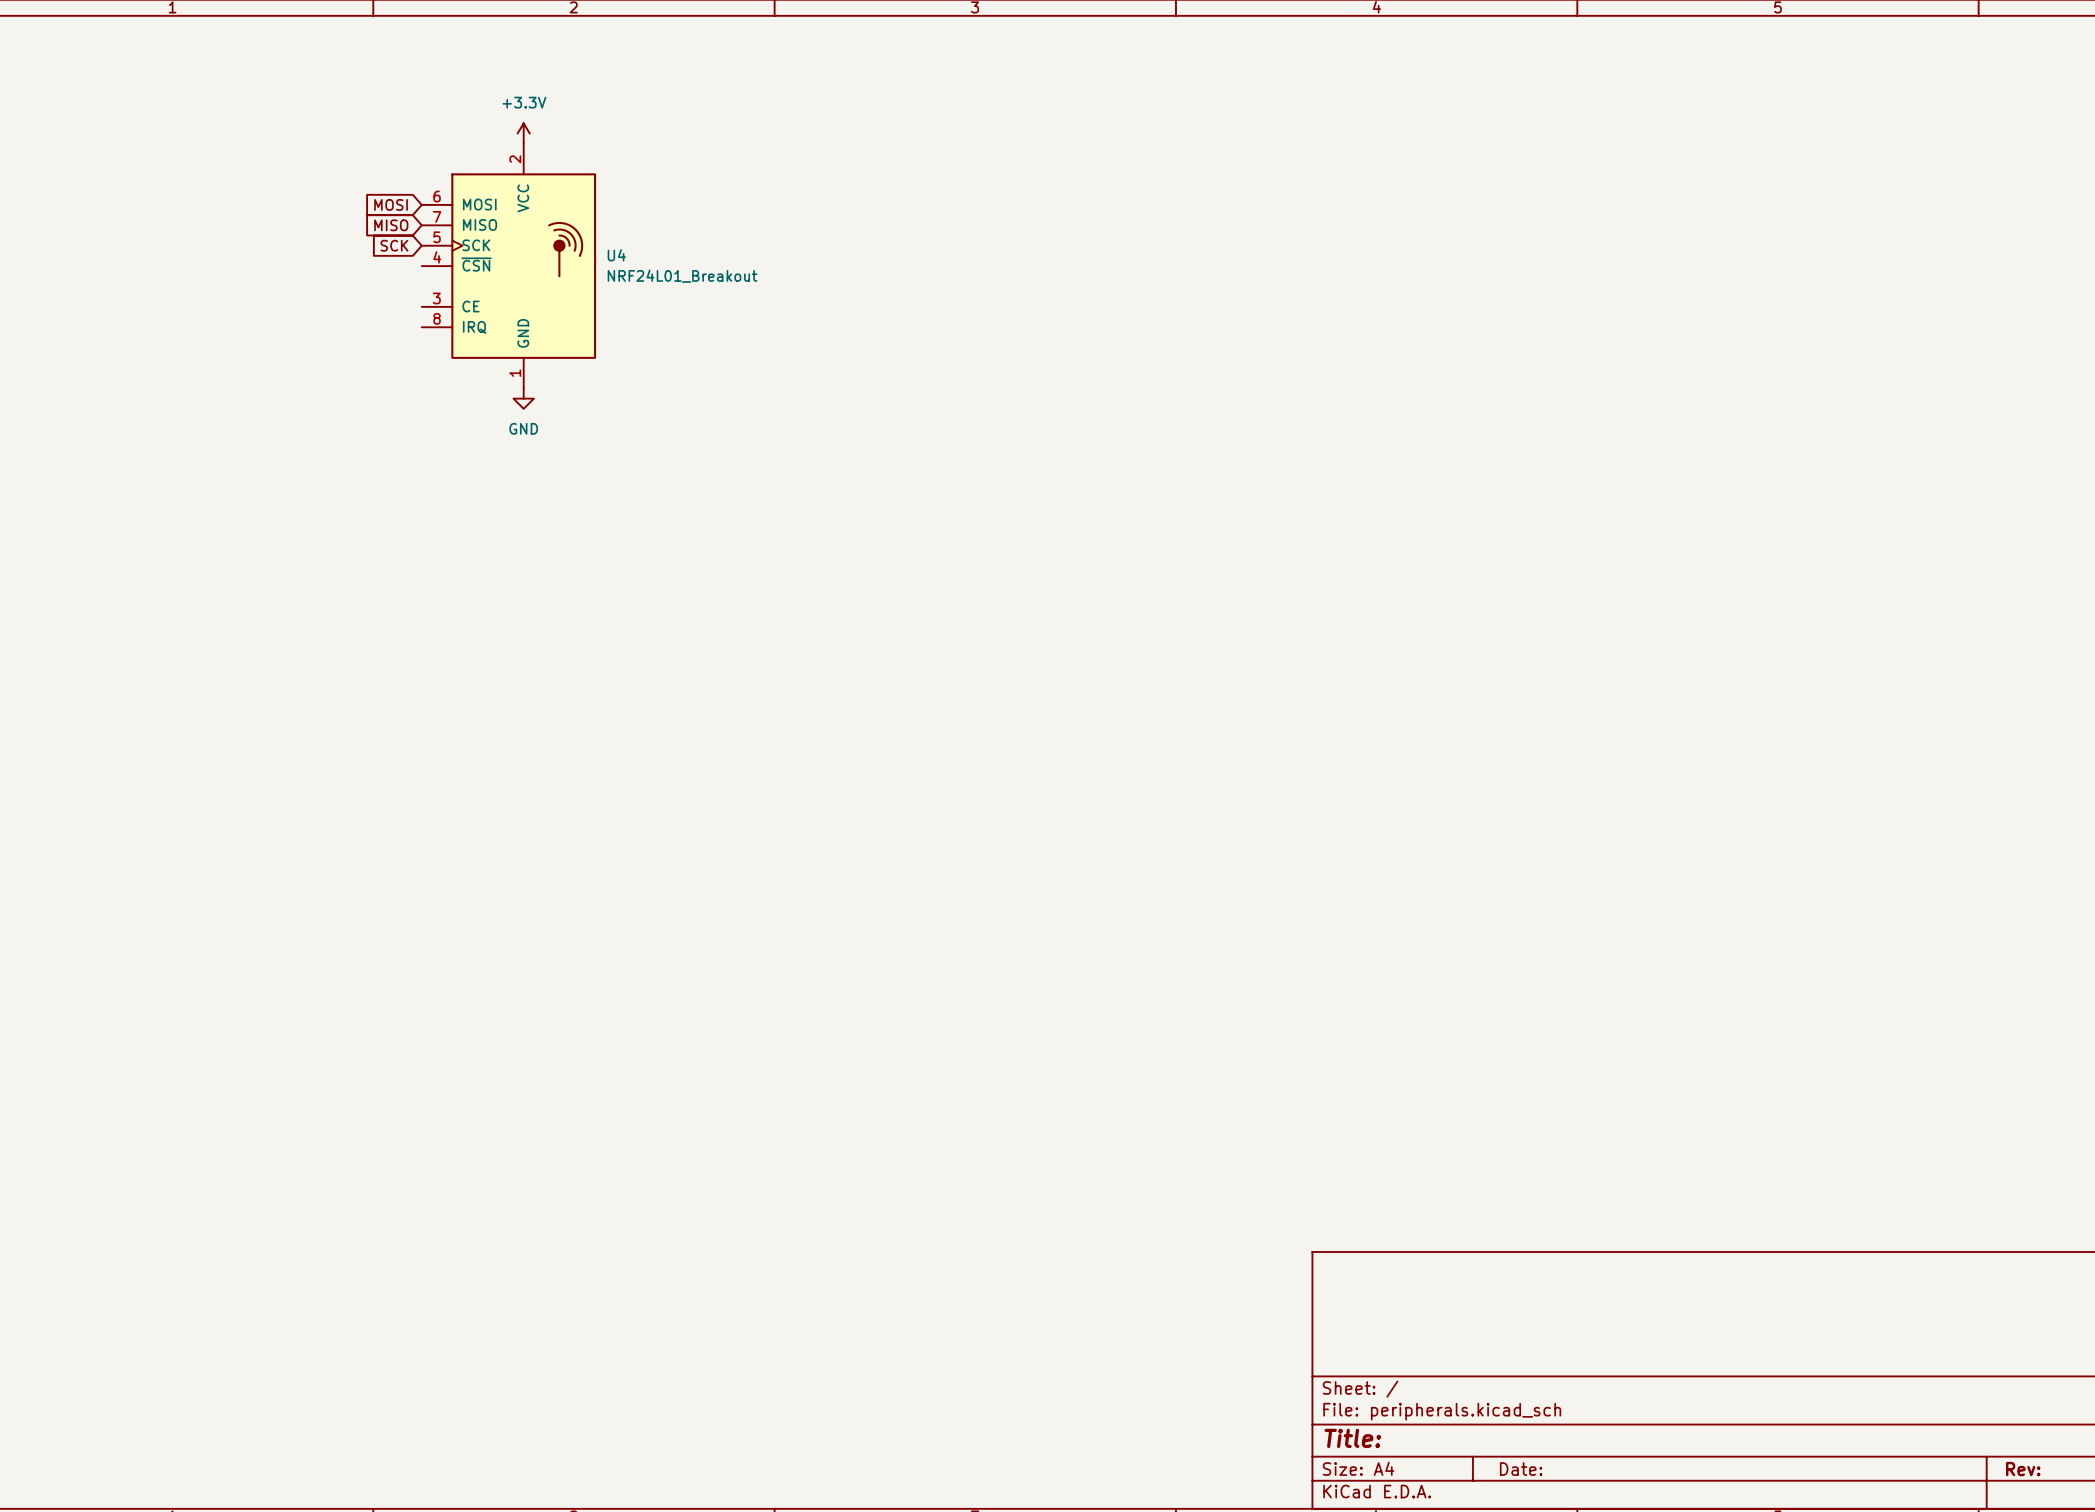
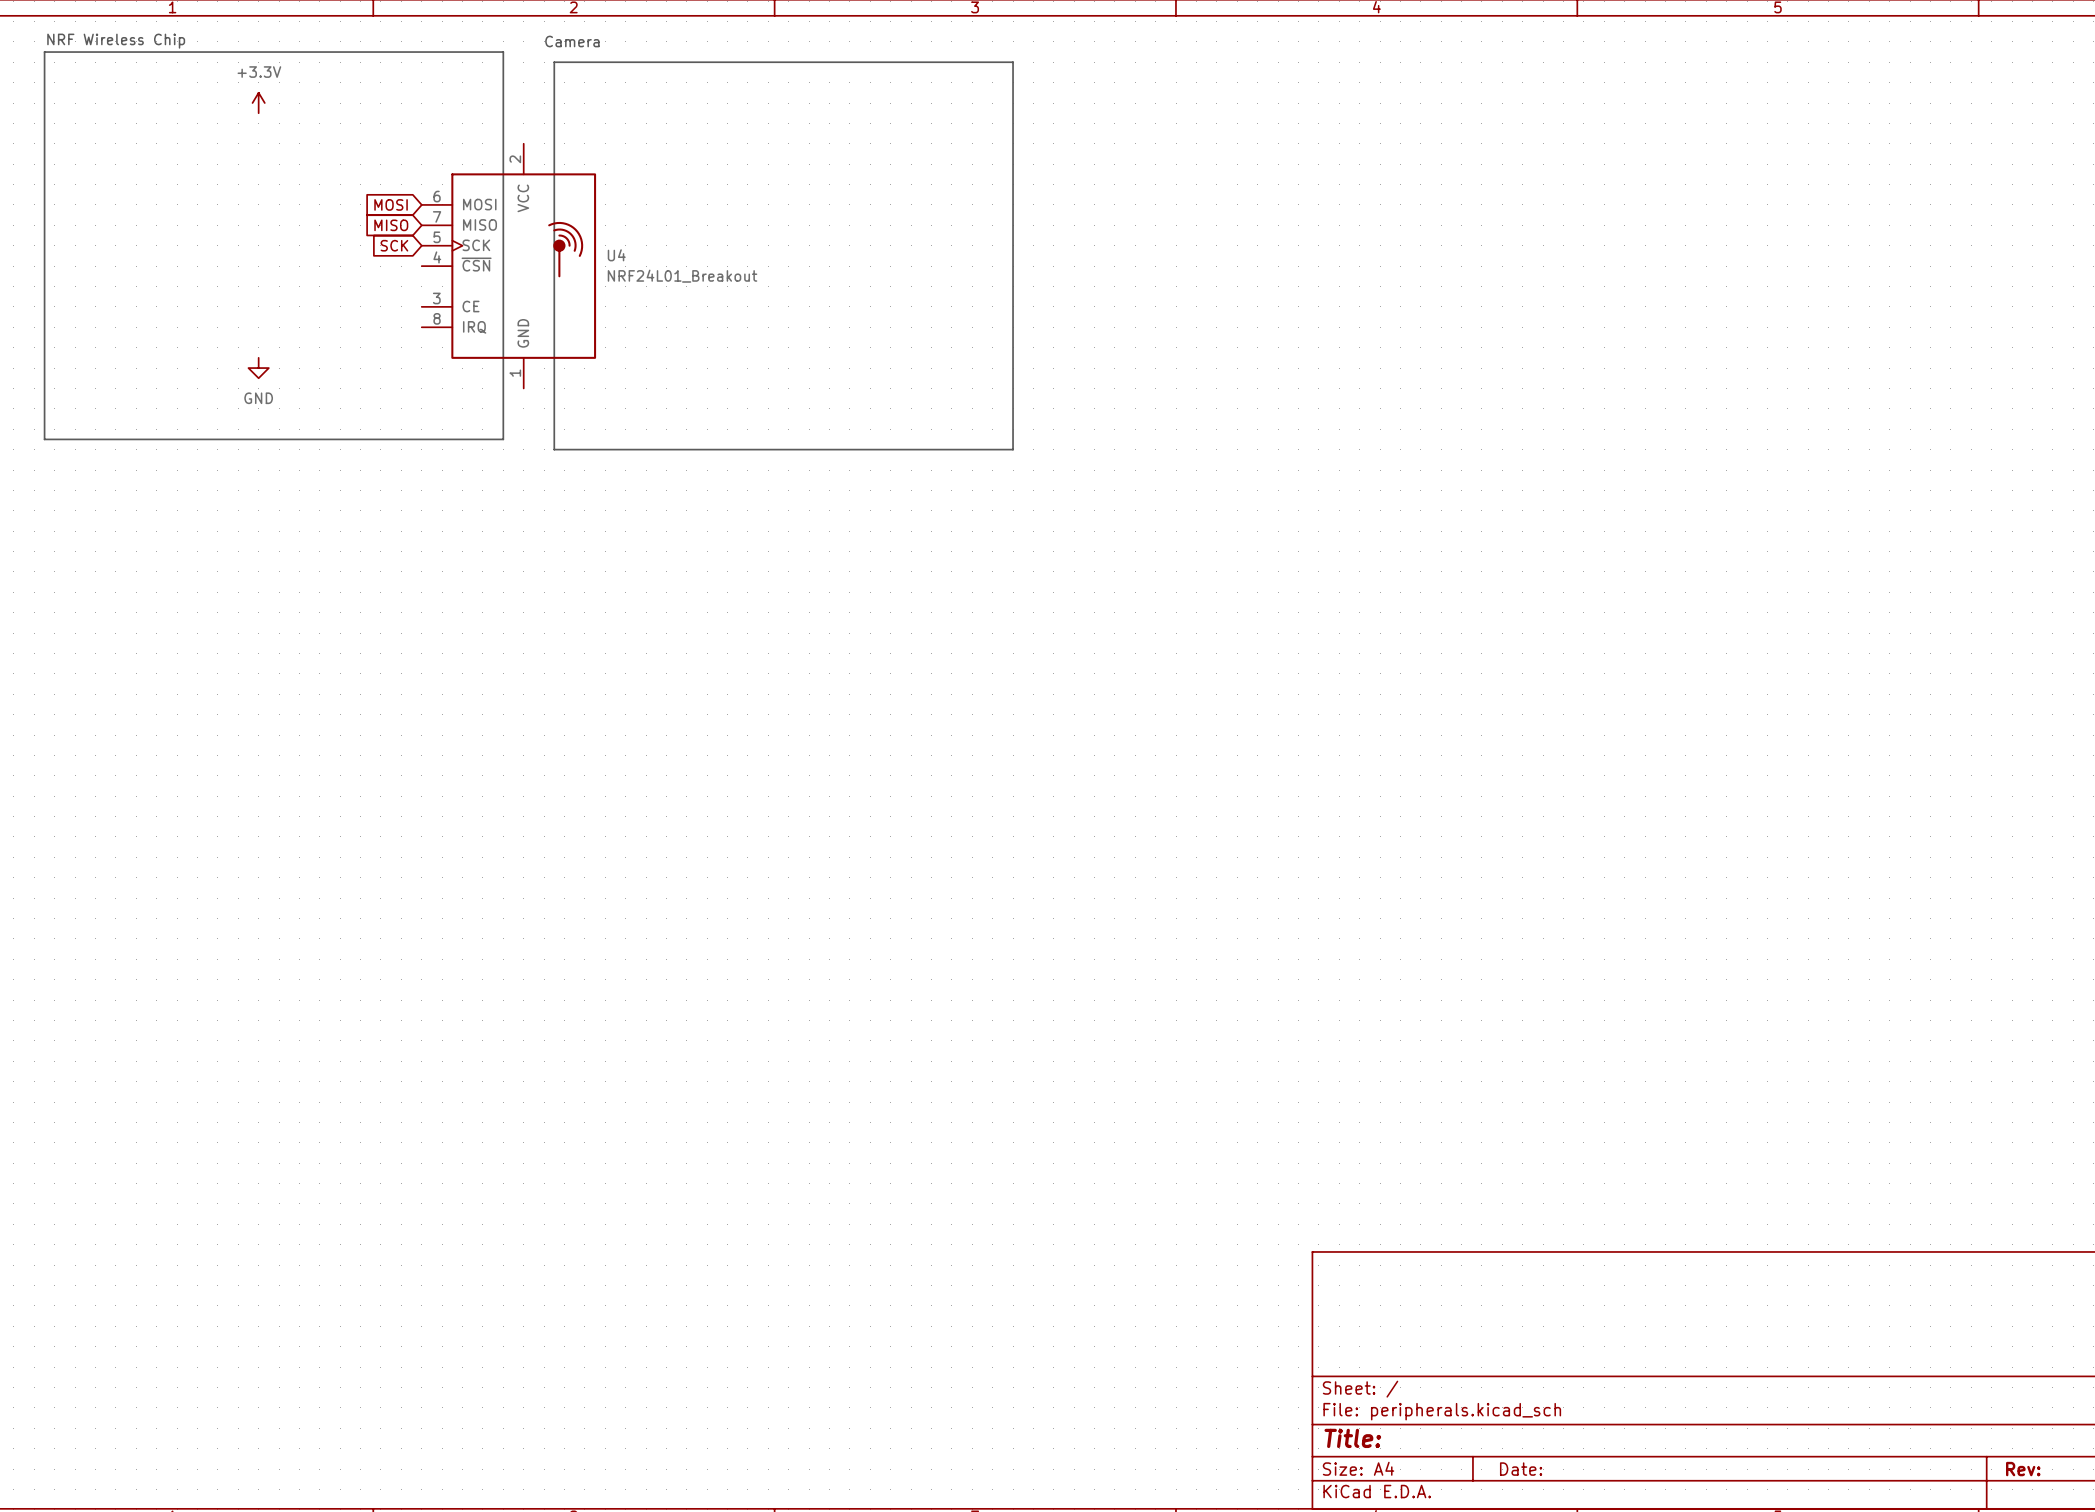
text: none -> NRF Wireless Chip (116, 41)
text: none -> Camera (572, 41)
line: none -> (44, 52) (503, 52) (503, 439) (44, 439) (44, 52)
line: none -> (554, 62) (1013, 62) (1013, 449) (554, 449) (554, 62)
power symbol: none -> +3.3V (258, 103)
power symbol: +3.3V (523, 133) -> none
power symbol: none -> GND (258, 368)
power symbol: GND (523, 398) -> none

